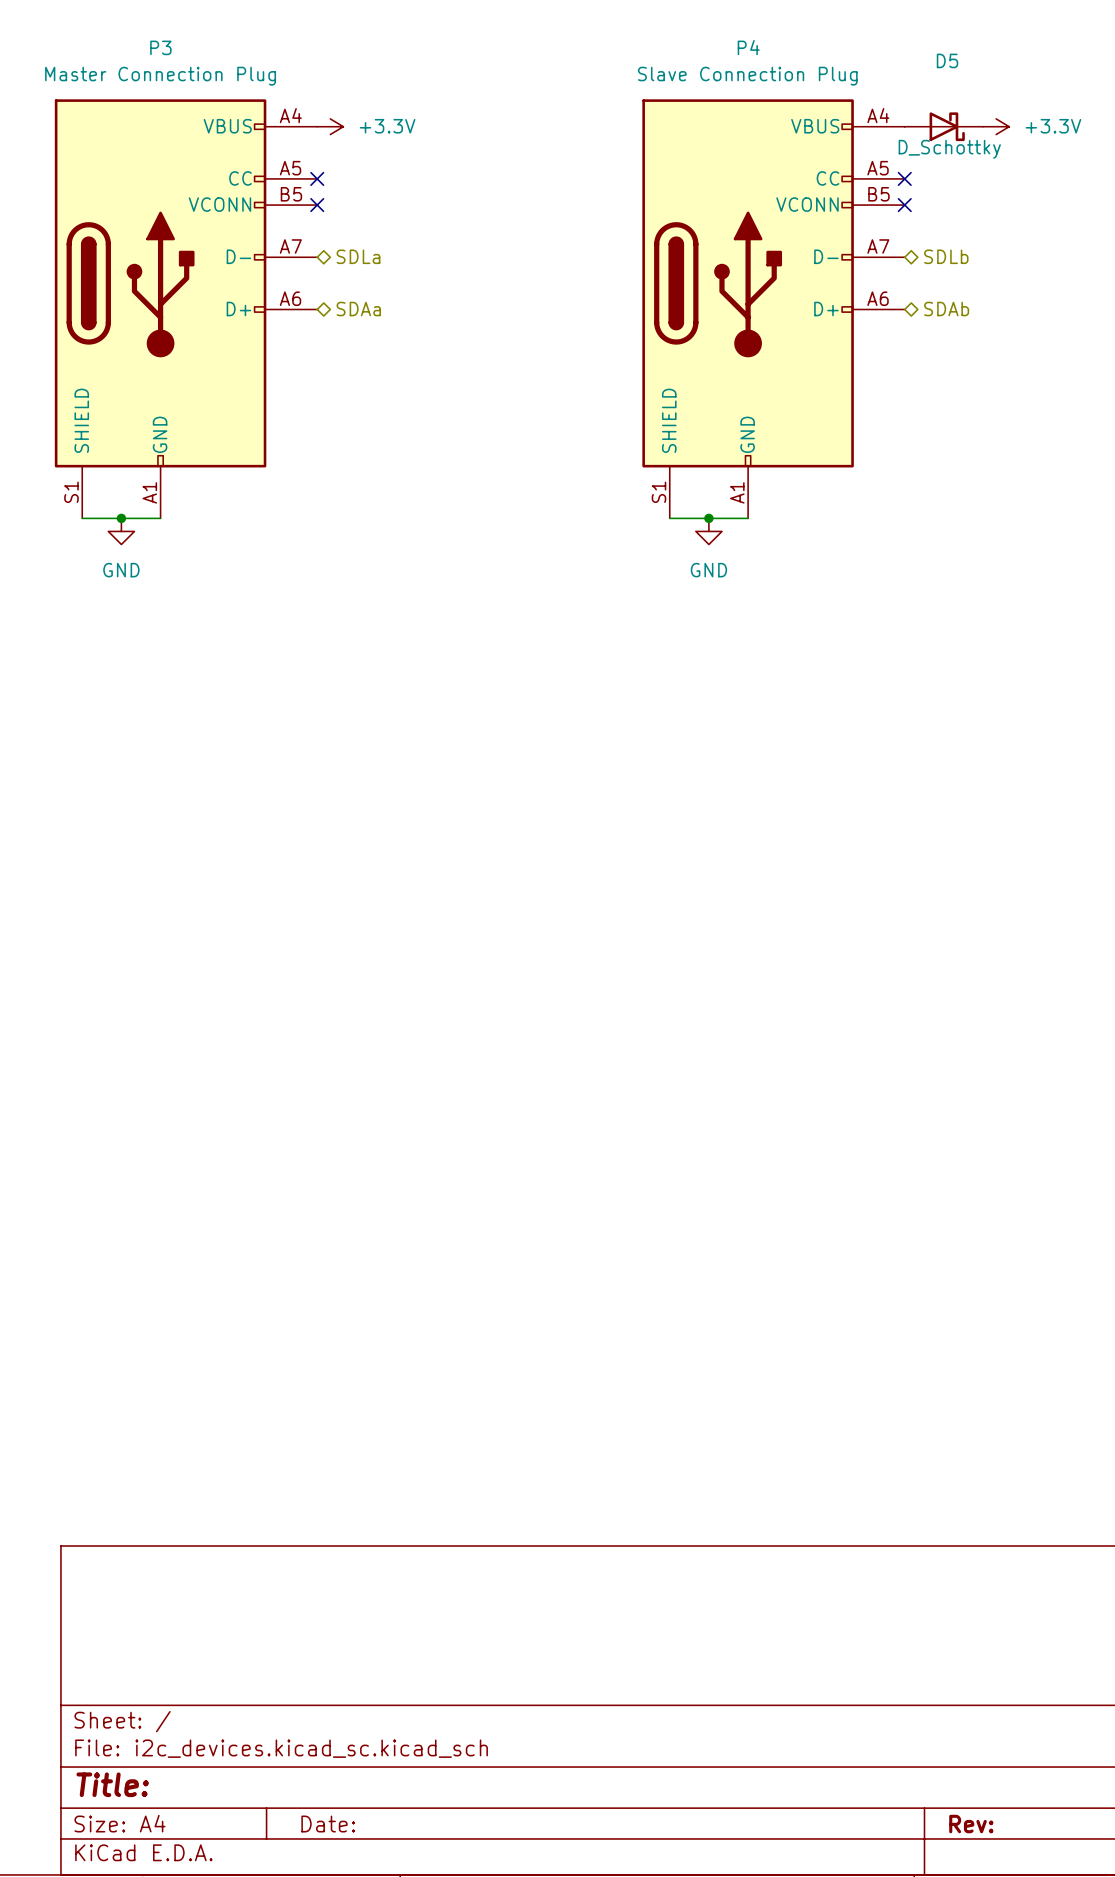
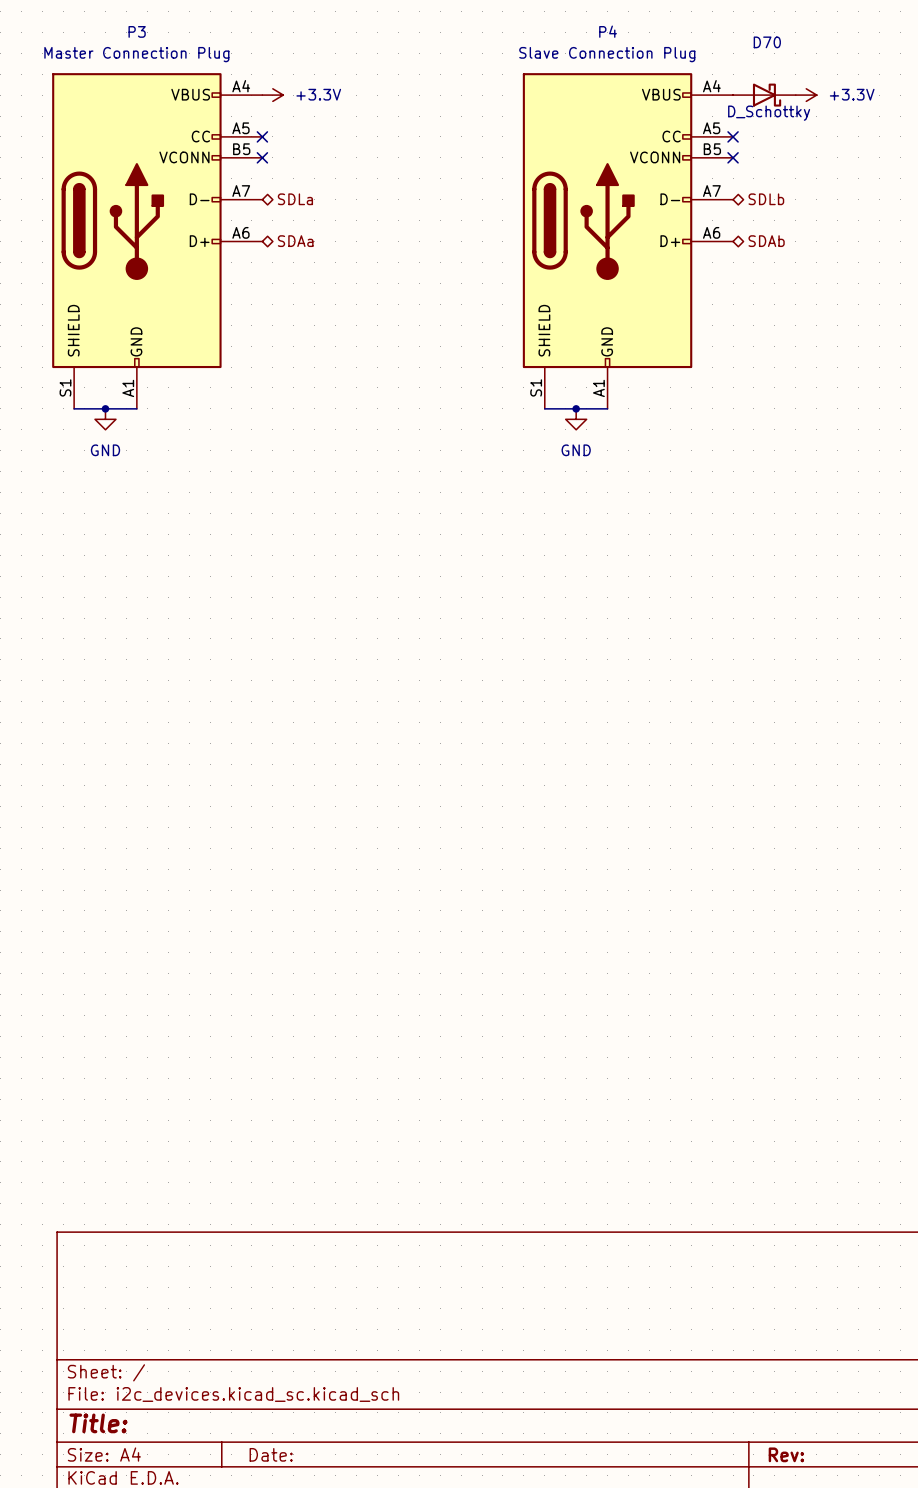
D5 name: D5 (947, 60) -> D70 (767, 42)

